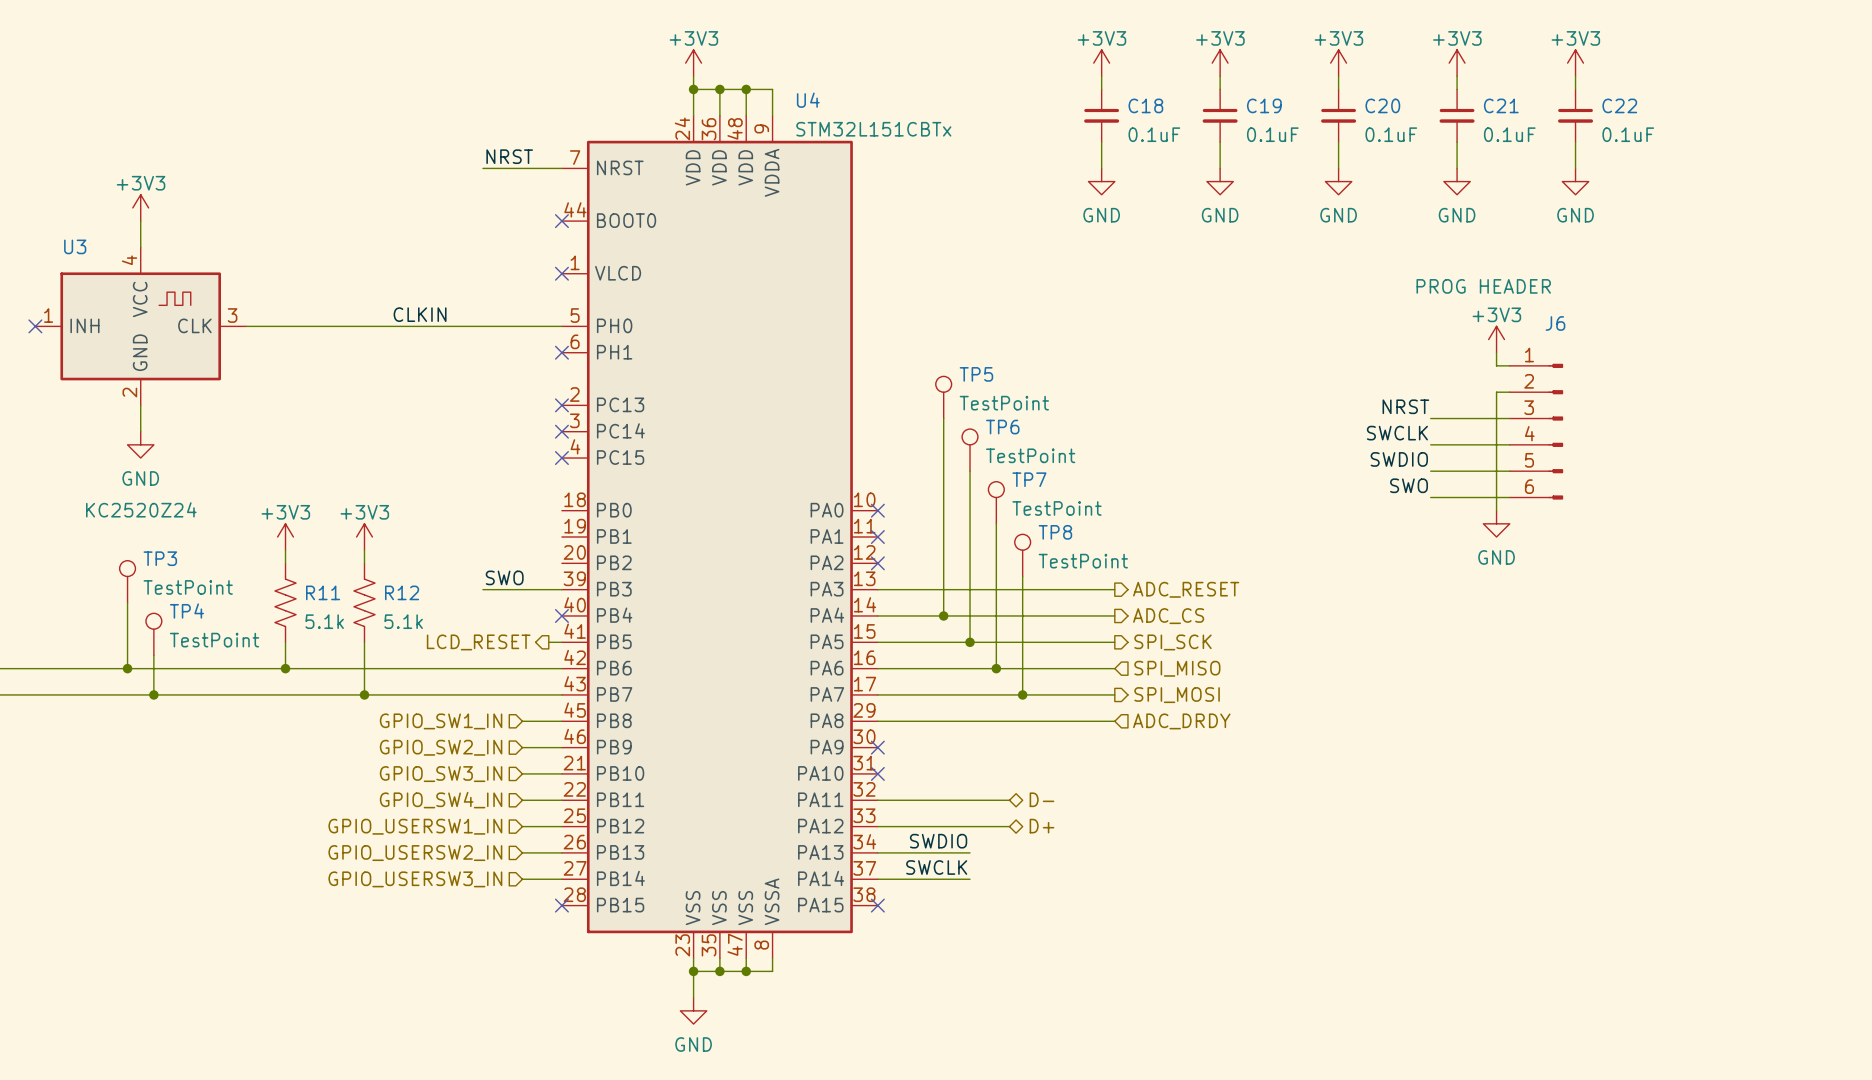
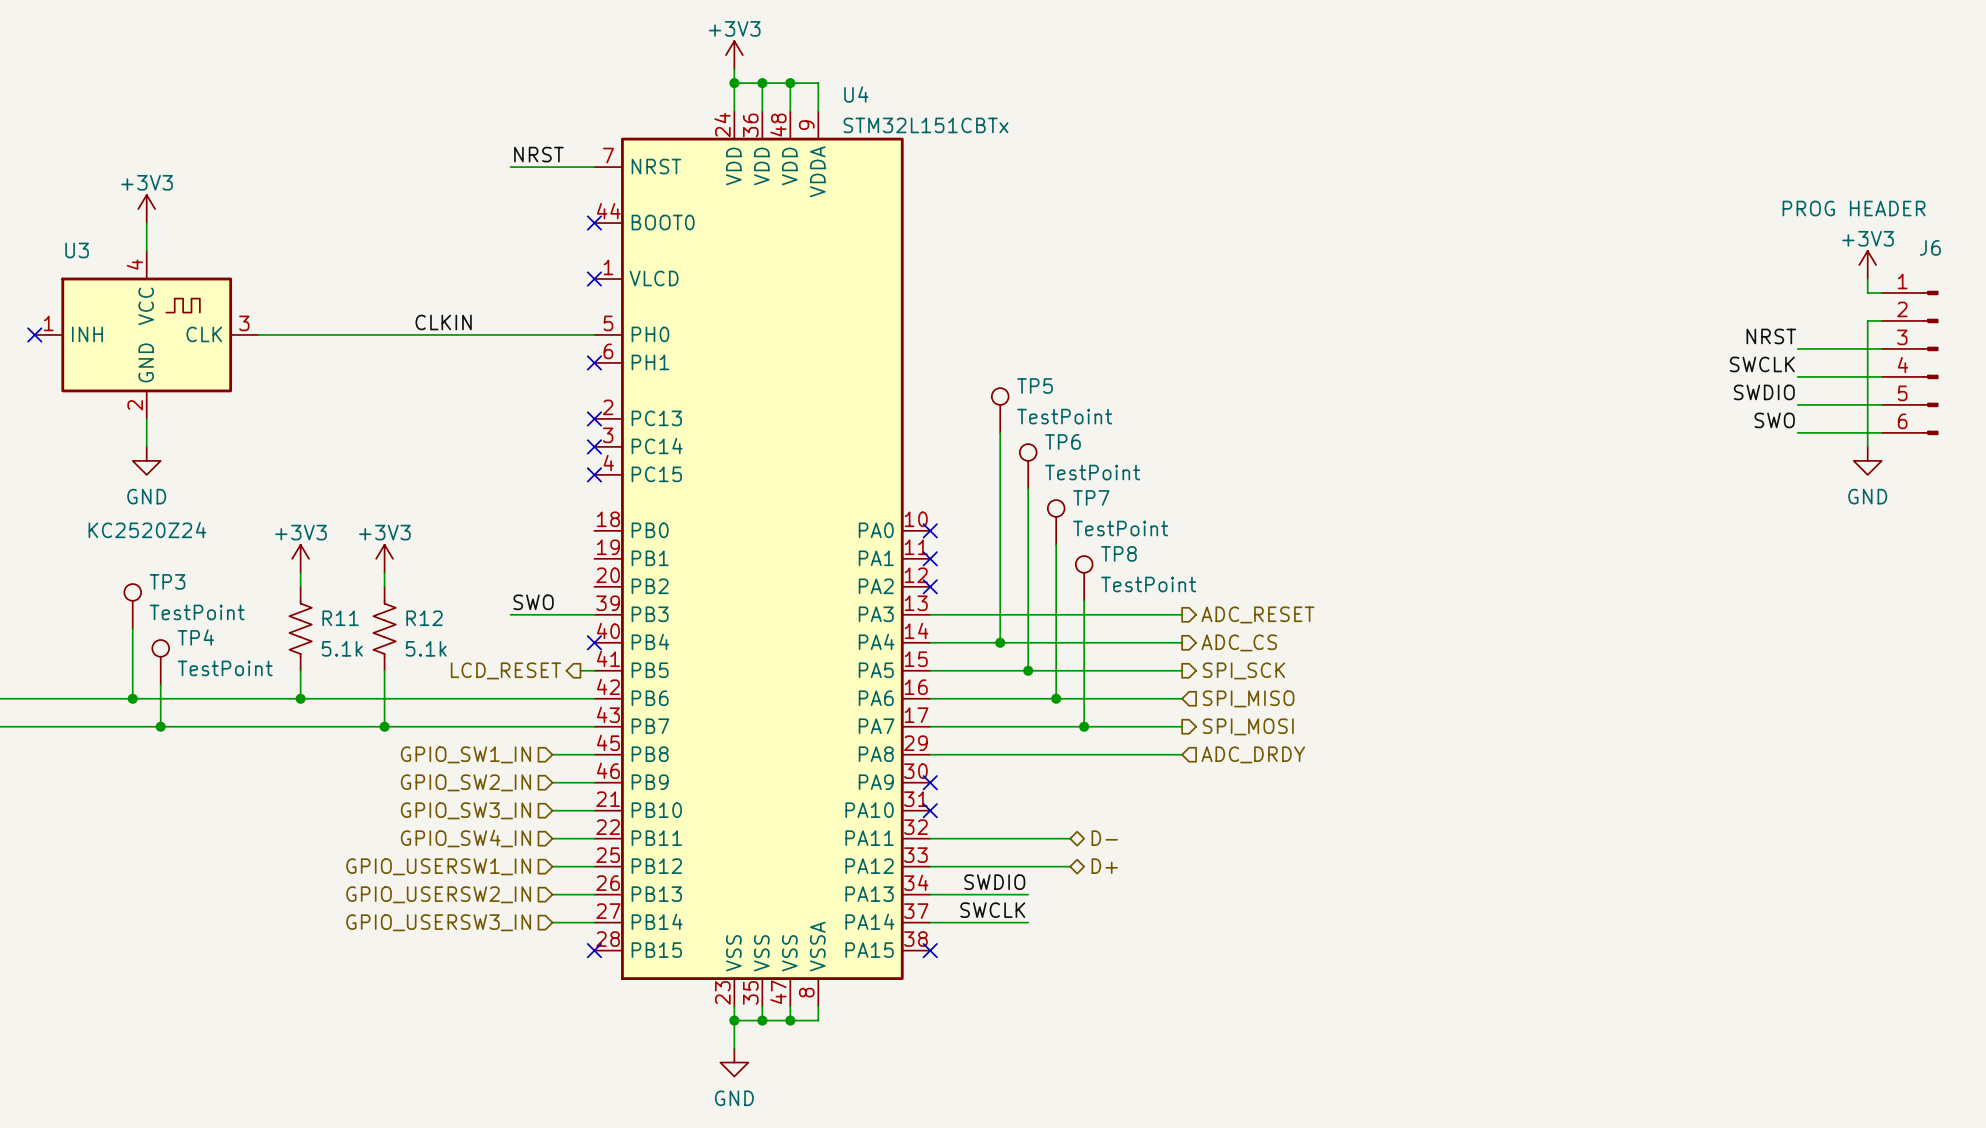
power symbol: +3V3 (1101, 63) -> none
power symbol: +3V3 (1220, 63) -> none
power symbol: +3V3 (1338, 63) -> none
power symbol: +3V3 (1457, 63) -> none
power symbol: +3V3 (1575, 63) -> none
wire: (1101, 76) (1101, 89) -> none
wire: (1220, 76) (1220, 89) -> none
wire: (1338, 76) (1338, 89) -> none
wire: (1457, 76) (1457, 89) -> none
wire: (1575, 76) (1575, 89) -> none
C18: 0.1uF (1101, 115) -> none
C19: 0.1uF (1220, 115) -> none
C20: 0.1uF (1338, 115) -> none
C21: 0.1uF (1457, 115) -> none
C22: 0.1uF (1575, 115) -> none
wire: (1101, 142) (1101, 168) -> none
wire: (1220, 142) (1220, 168) -> none
wire: (1338, 142) (1338, 168) -> none
wire: (1457, 142) (1457, 168) -> none
wire: (1575, 142) (1575, 168) -> none
power symbol: GND (1101, 181) -> none
power symbol: GND (1220, 181) -> none
power symbol: GND (1338, 181) -> none
power symbol: GND (1457, 181) -> none
power symbol: GND (1575, 181) -> none
power symbol: none -> +3V3 (1867, 265)
wire: none -> (1867, 279) (1867, 292) (1881, 292)
wire: none -> (1881, 320) (1867, 320) (1867, 446)
label: none -> NRST (1771, 336)
power symbol: +3V3 (1496, 339) -> none
wire: none -> (1797, 348) (1881, 348)
wire: (1496, 352) (1496, 365) (1509, 365) -> none
label: none -> SWCLK (1762, 364)
wire: none -> (1797, 376) (1881, 376)
label: none -> SWDIO (1764, 392)
wire: (1509, 392) (1496, 392) (1496, 510) -> none
wire: none -> (1797, 404) (1881, 404)
label: NRST (1405, 406) -> none
label: none -> SWO (1774, 420)
wire: (1430, 418) (1509, 418) -> none
wire: none -> (1797, 432) (1881, 432)
J6 position: (1536, 431) -> (1910, 362)
label: SWCLK (1397, 433) -> none
wire: (1430, 444) (1509, 444) -> none
power symbol: none -> GND (1867, 460)
label: SWDIO (1399, 459) -> none
wire: (1430, 471) (1509, 471) -> none
label: SWO (1409, 485) -> none
wire: (1430, 497) (1509, 497) -> none
power symbol: GND (1496, 523) -> none

